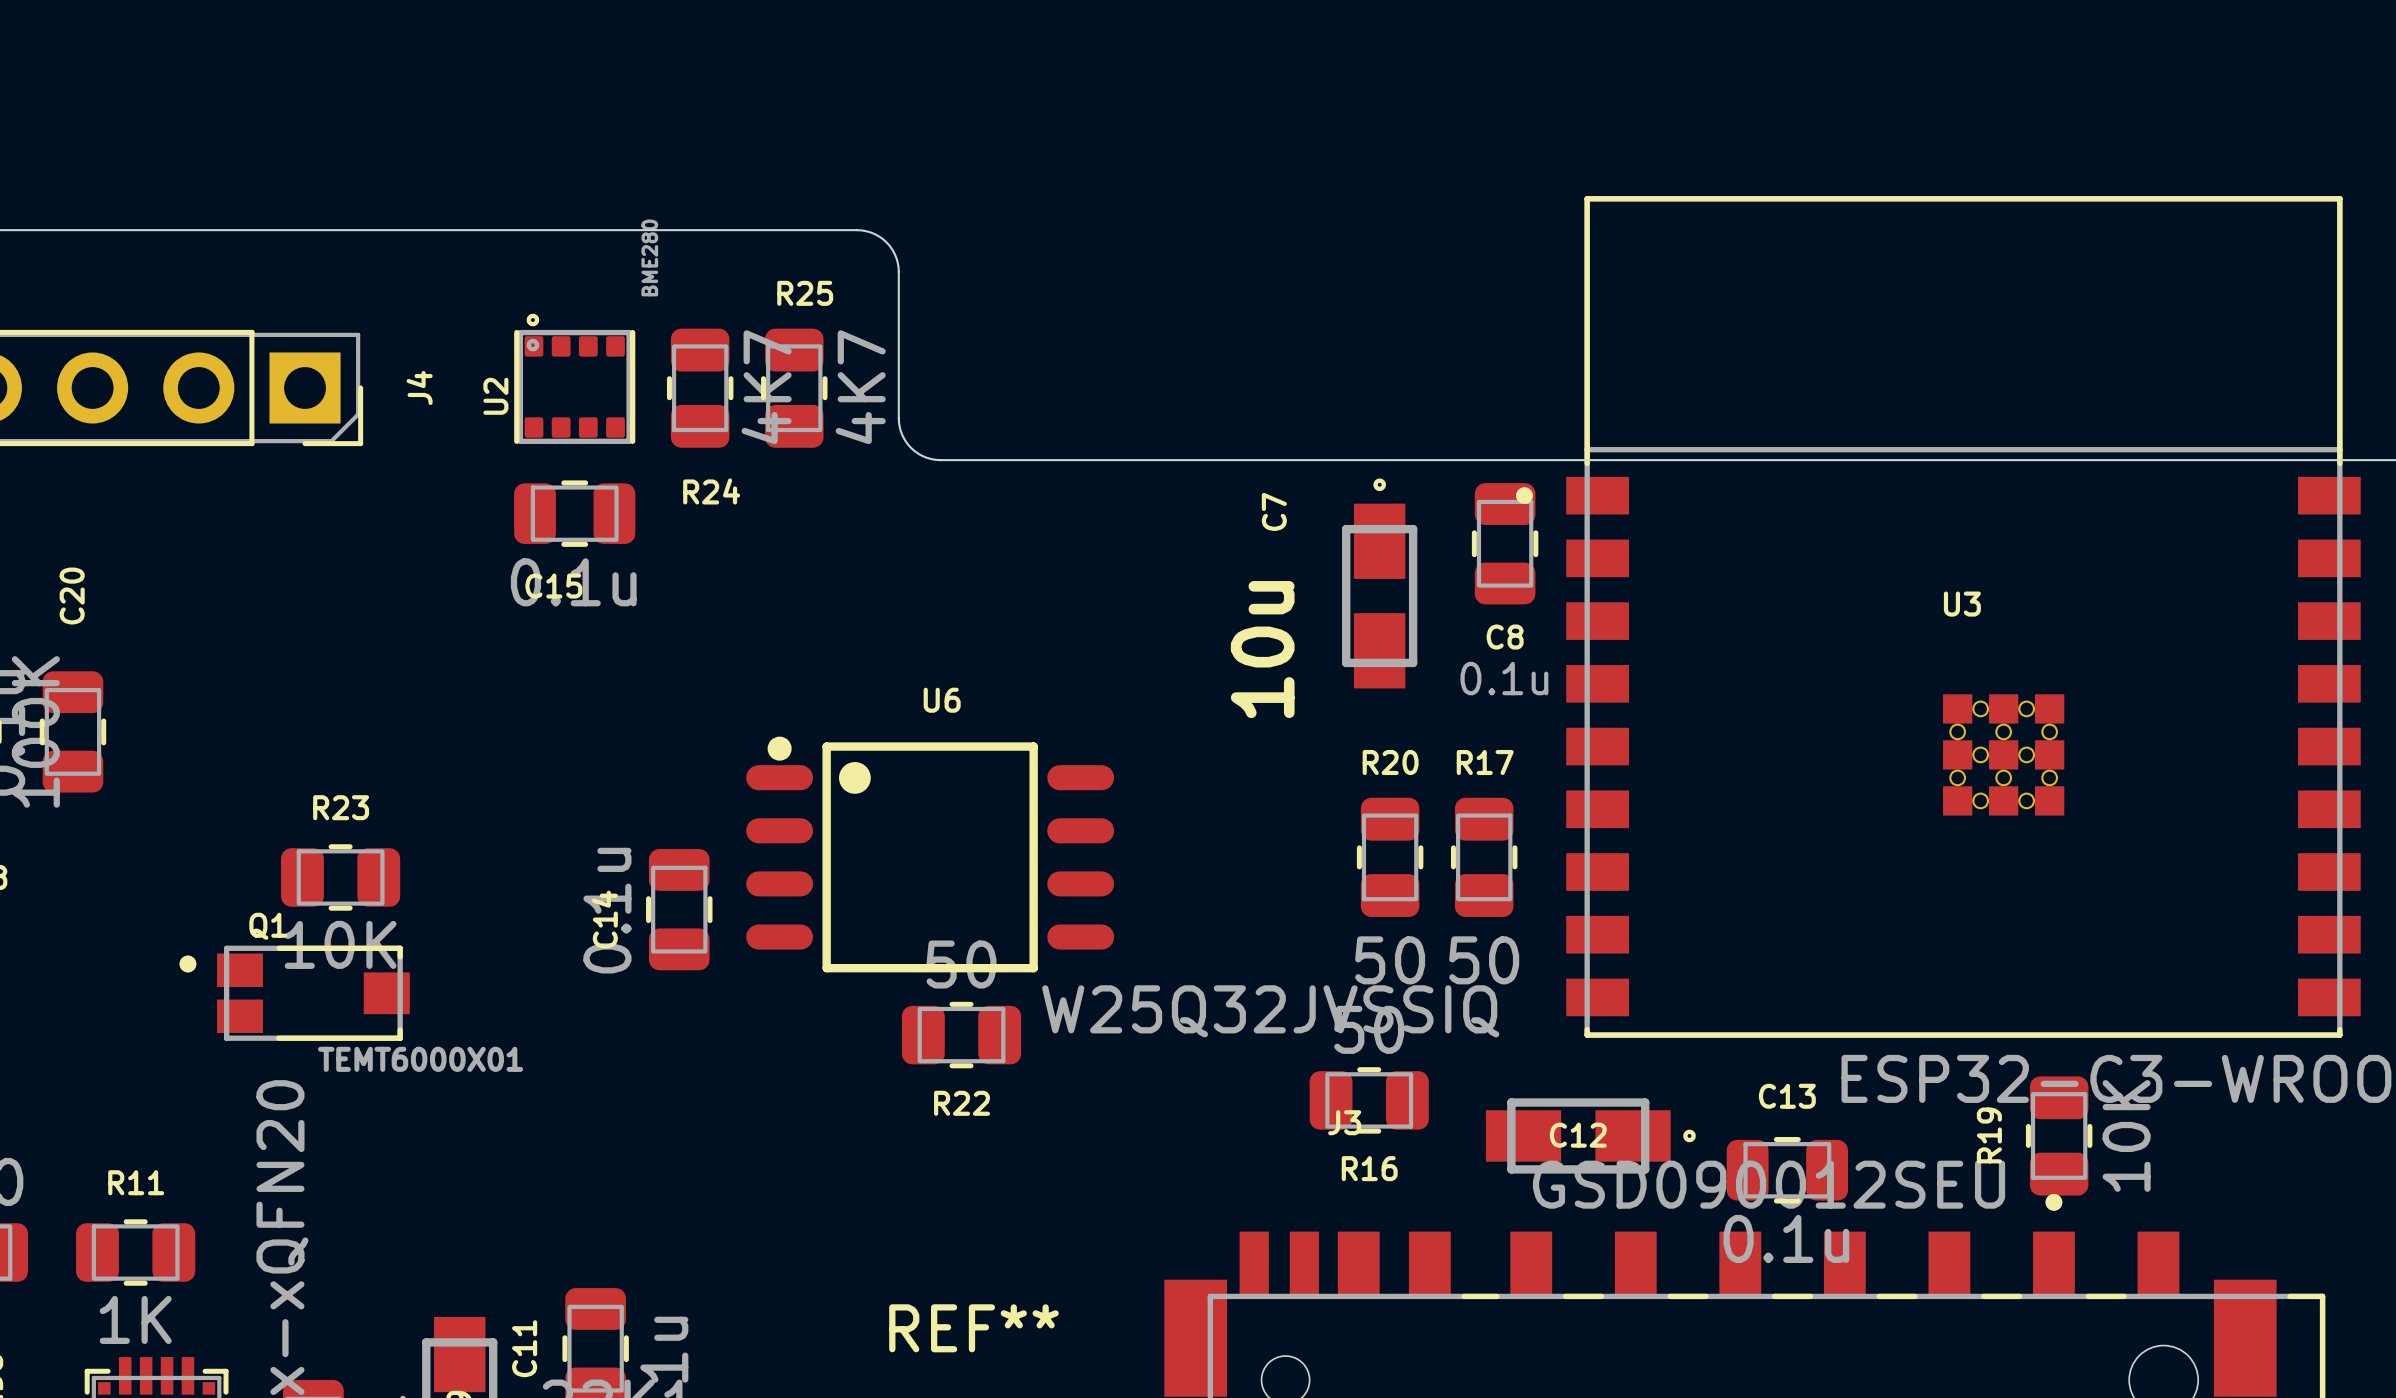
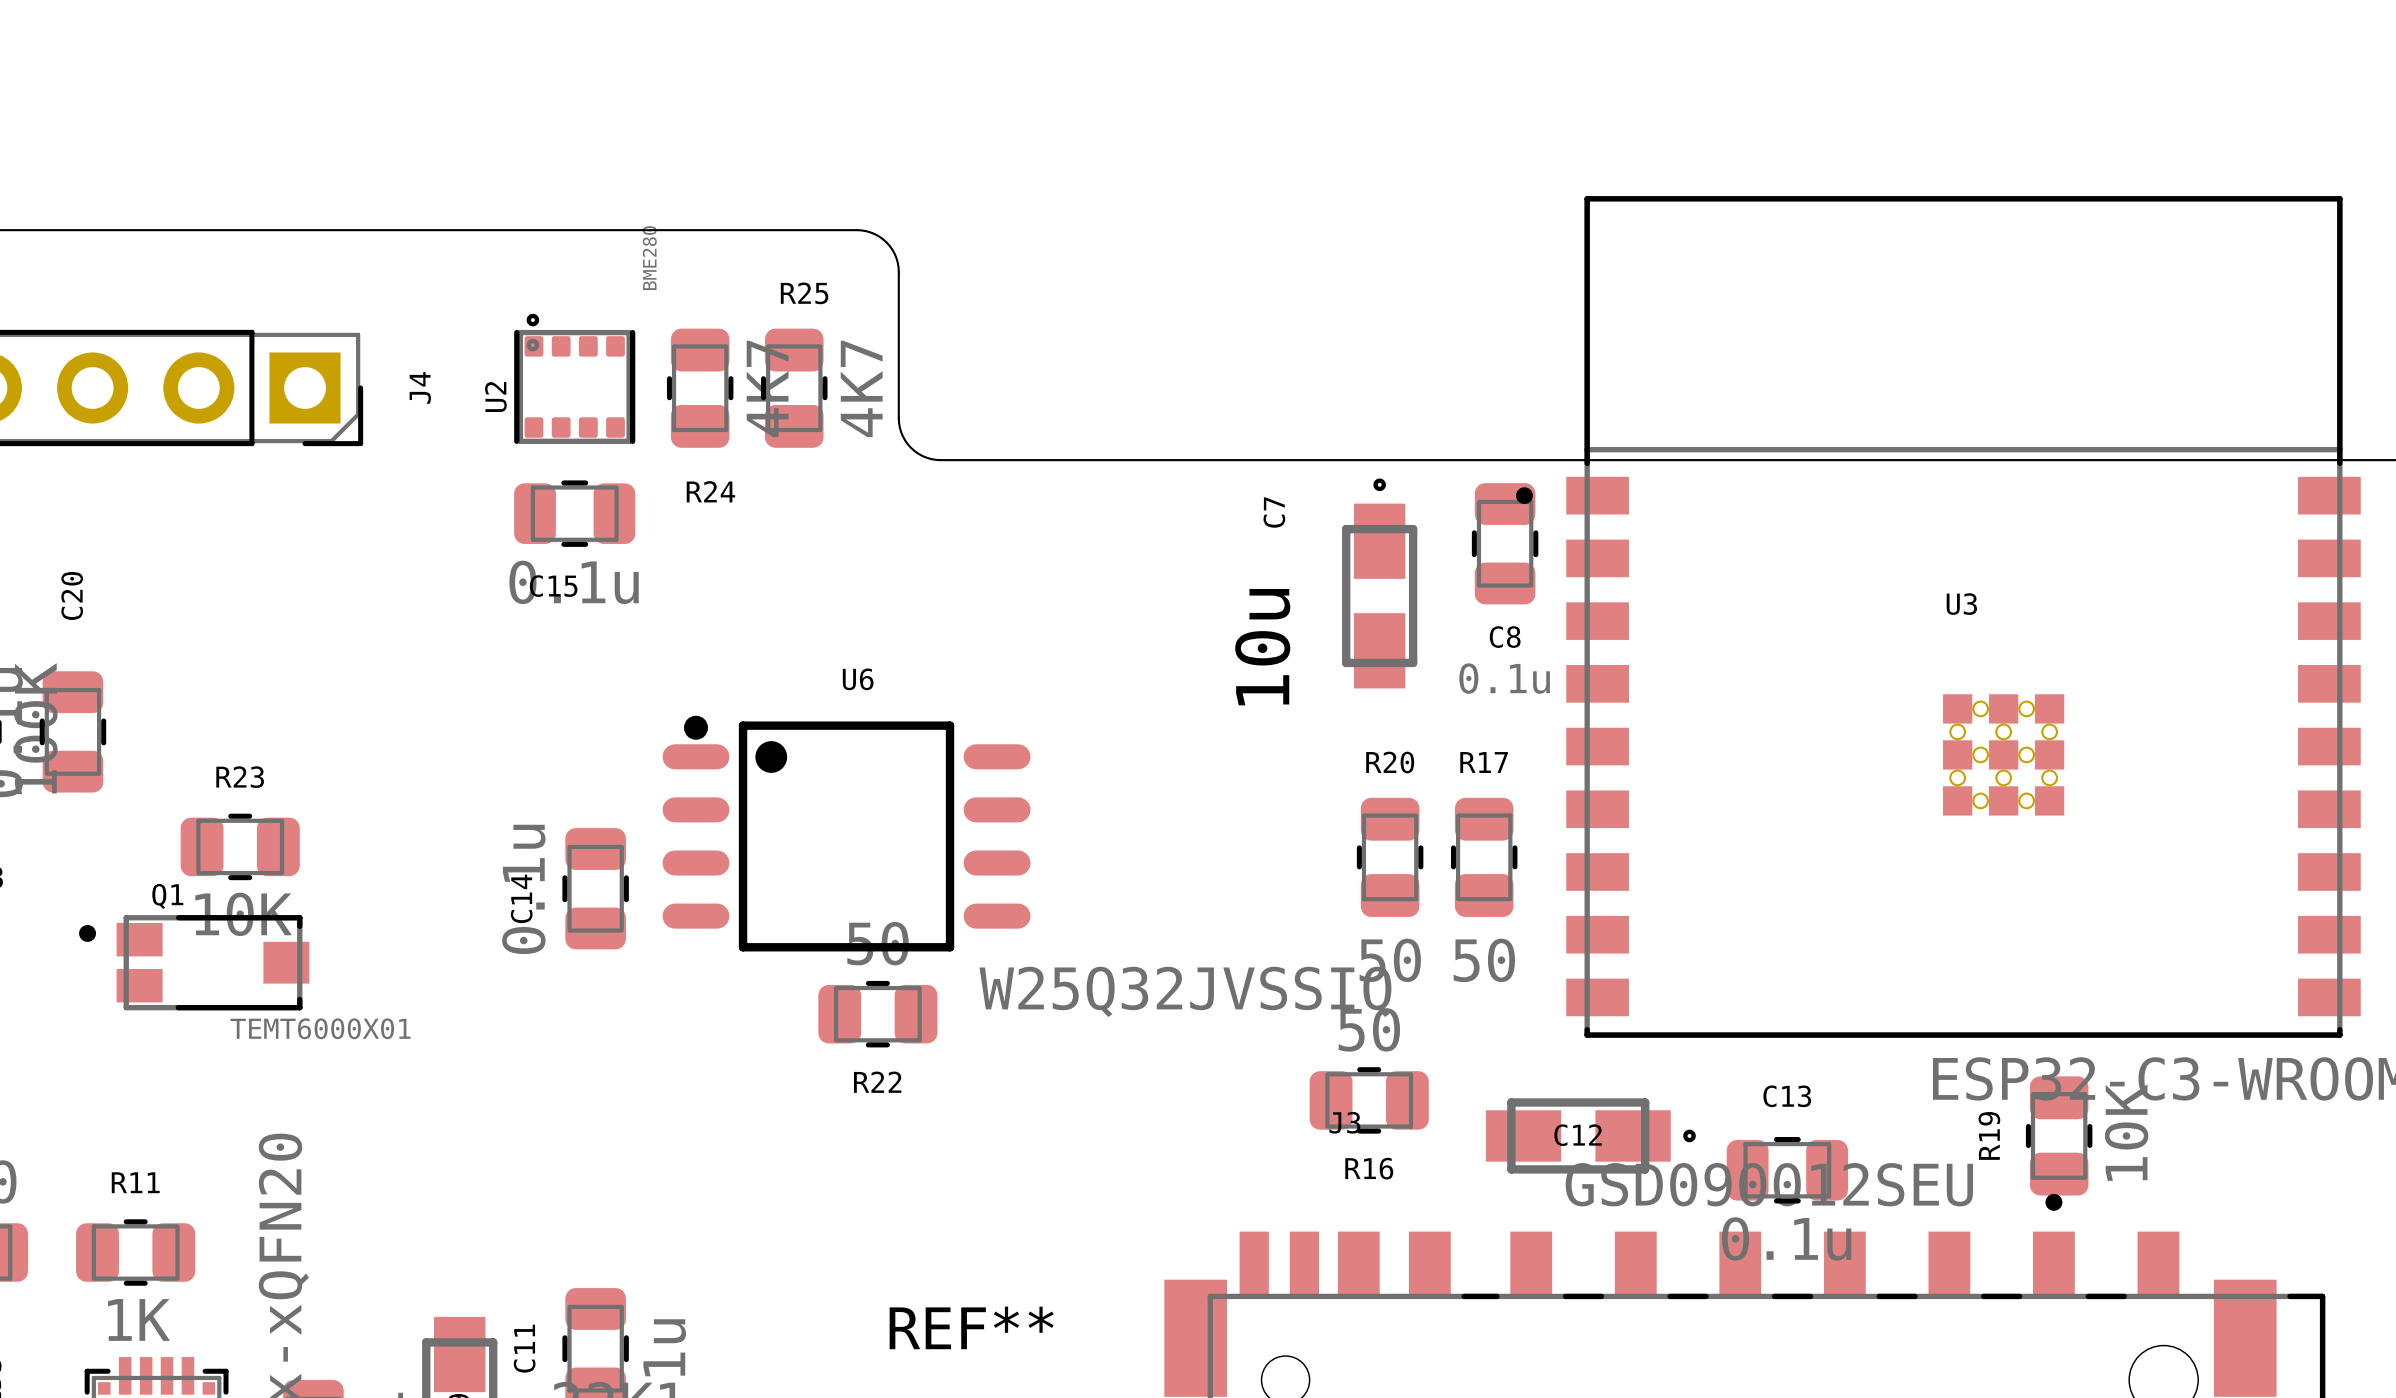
U6 position: (930, 854) -> (846, 833)
R23 position: (340, 877) -> (240, 846)
C14 position: (679, 909) -> (595, 888)
Q1 position: (294, 993) -> (194, 962)
R22 position: (961, 1035) -> (877, 1014)

